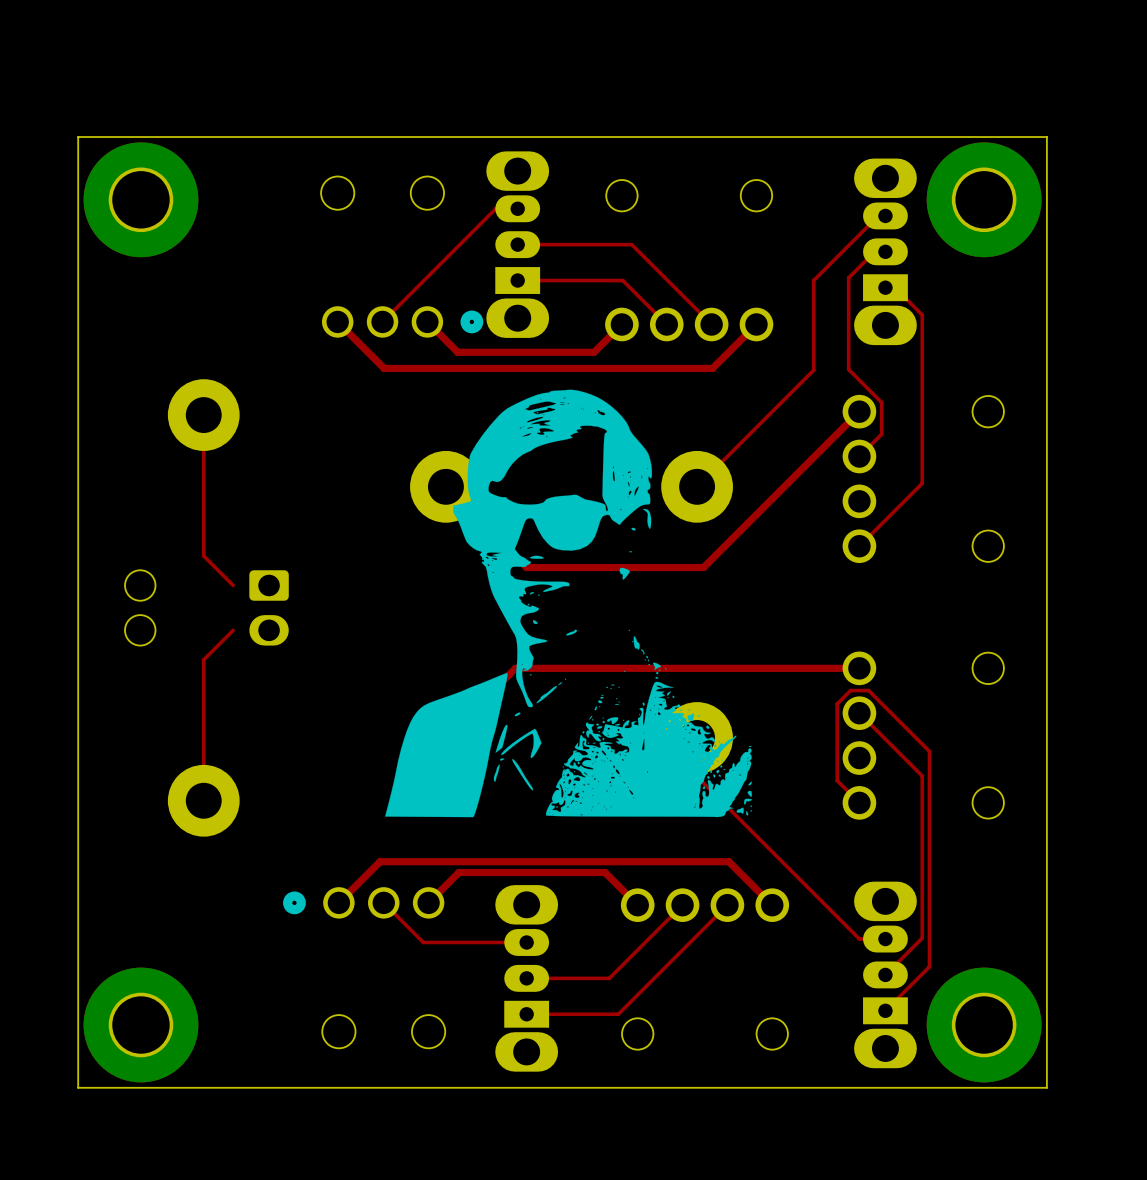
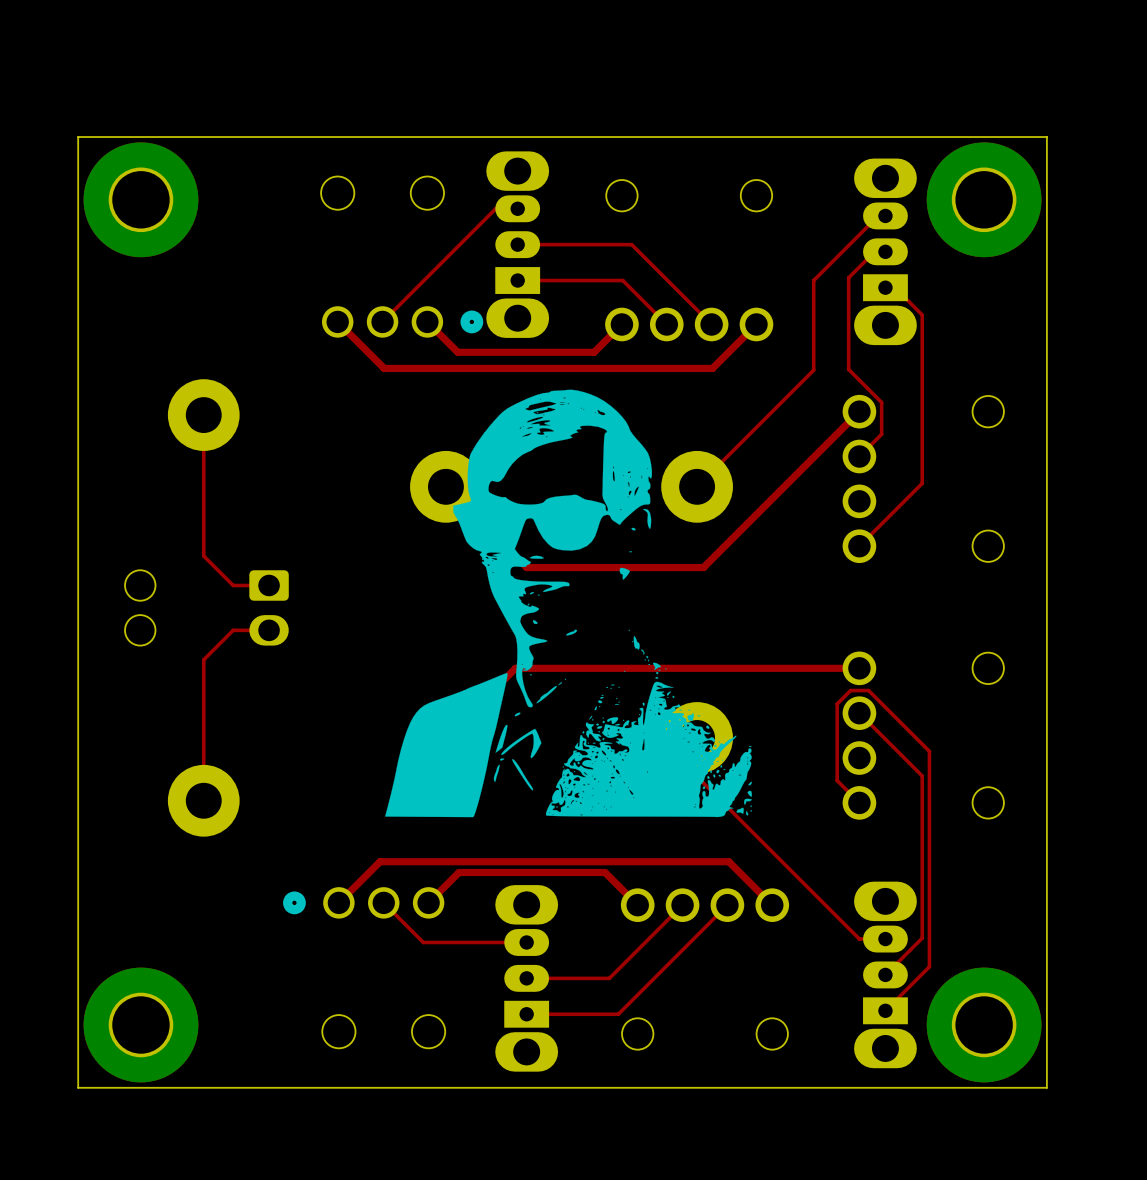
top track: none -> (269, 585) (233, 585)
top track: none -> (269, 630) (233, 630)

